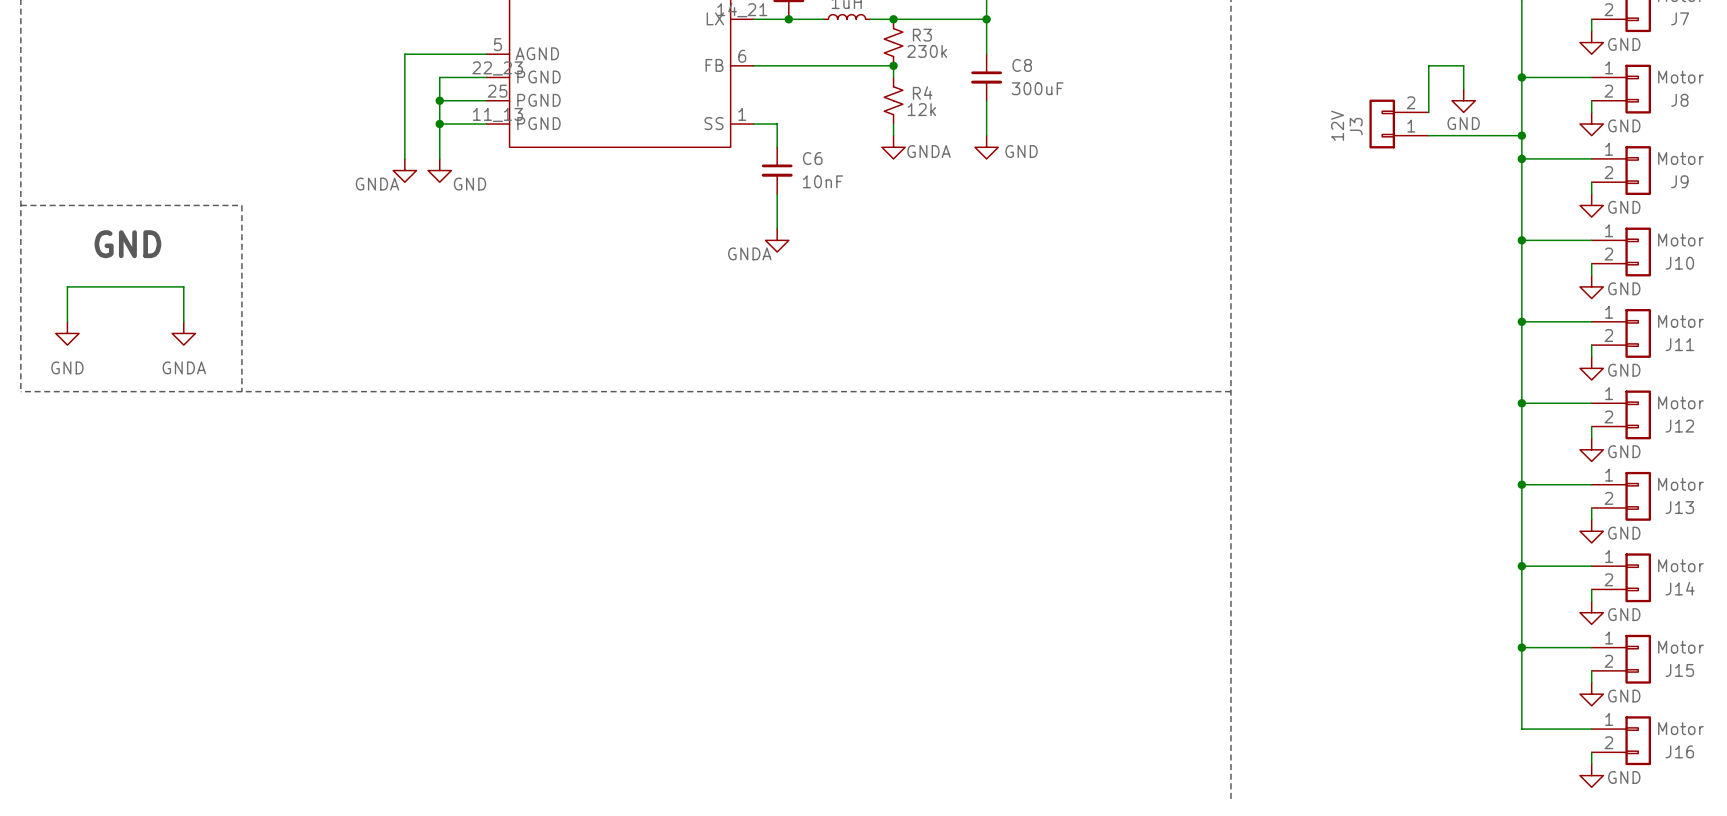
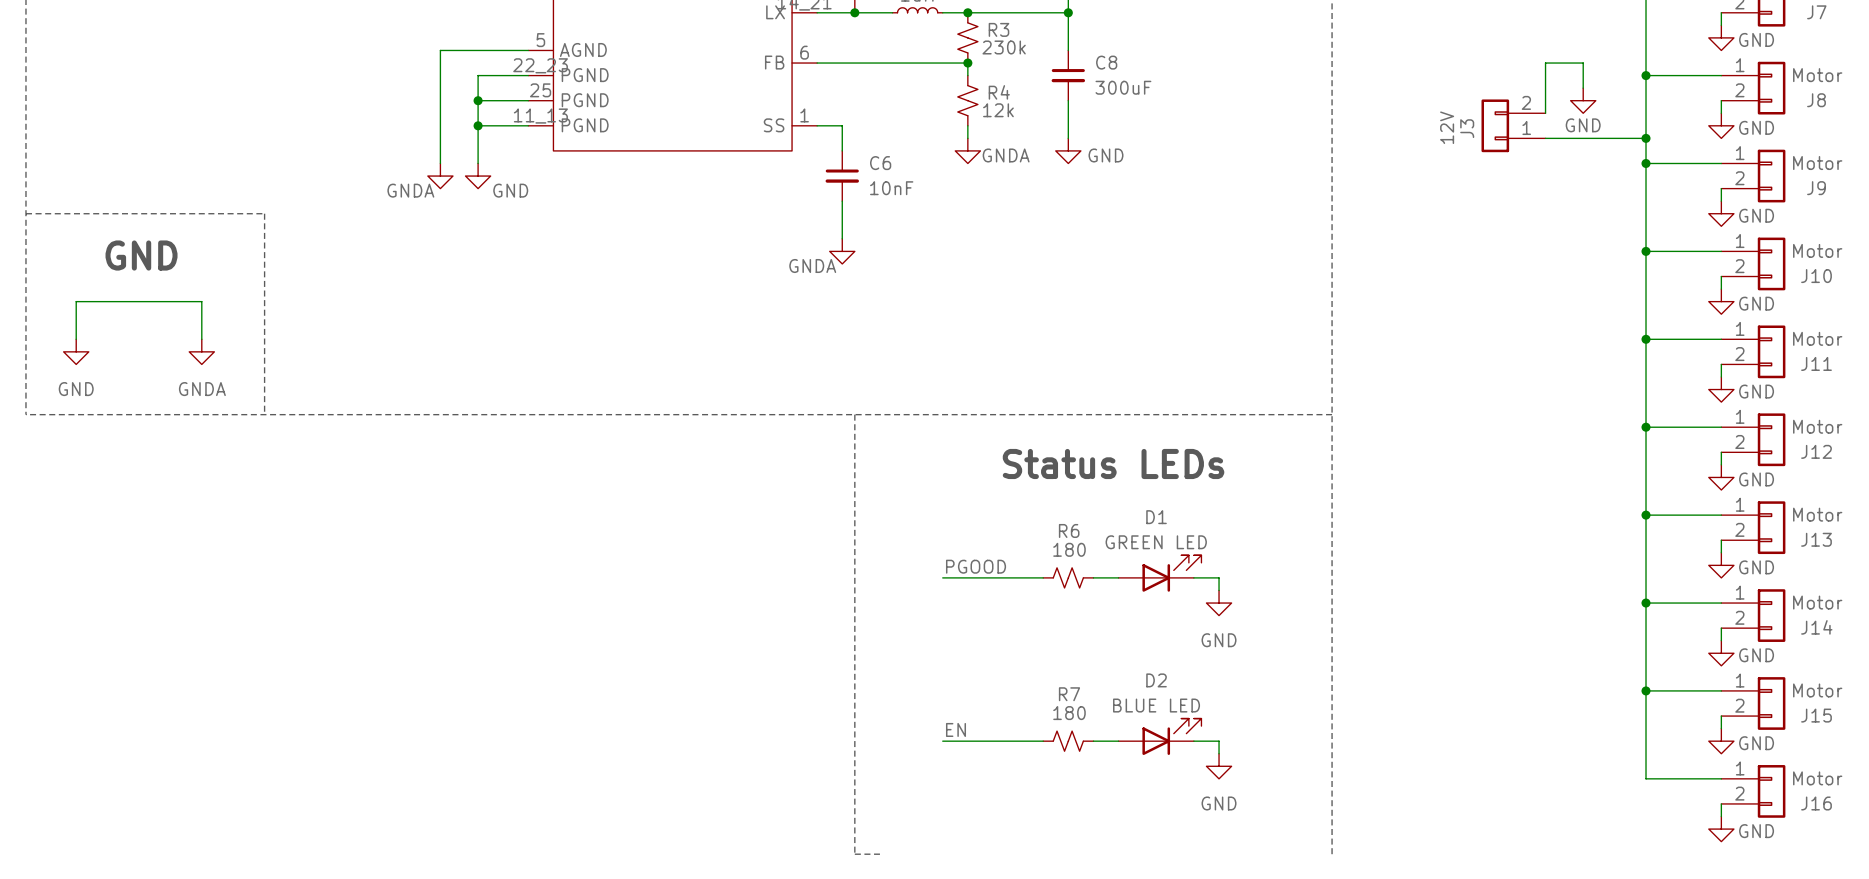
line: none -> (854, 414) (854, 854) (879, 854)
text: none -> Status LEDs (1113, 463)
label: none -> PGOOD (976, 566)
D1: none -> GREEN LED (1160, 573)
wire: none -> (942, 577) (1043, 577)
R6: none -> 180 (1068, 577)
wire: none -> (1093, 577) (1118, 577)
wire: none -> (1193, 577) (1219, 577) (1219, 590)
power symbol: none -> GND (1219, 603)
label: none -> EN (955, 729)
D2: none -> BLUE LED (1160, 736)
wire: none -> (942, 741) (1043, 741)
R7: none -> 180 (1068, 741)
wire: none -> (1093, 741) (1118, 741)
wire: none -> (1193, 741) (1219, 741) (1219, 753)
power symbol: none -> GND (1219, 766)

